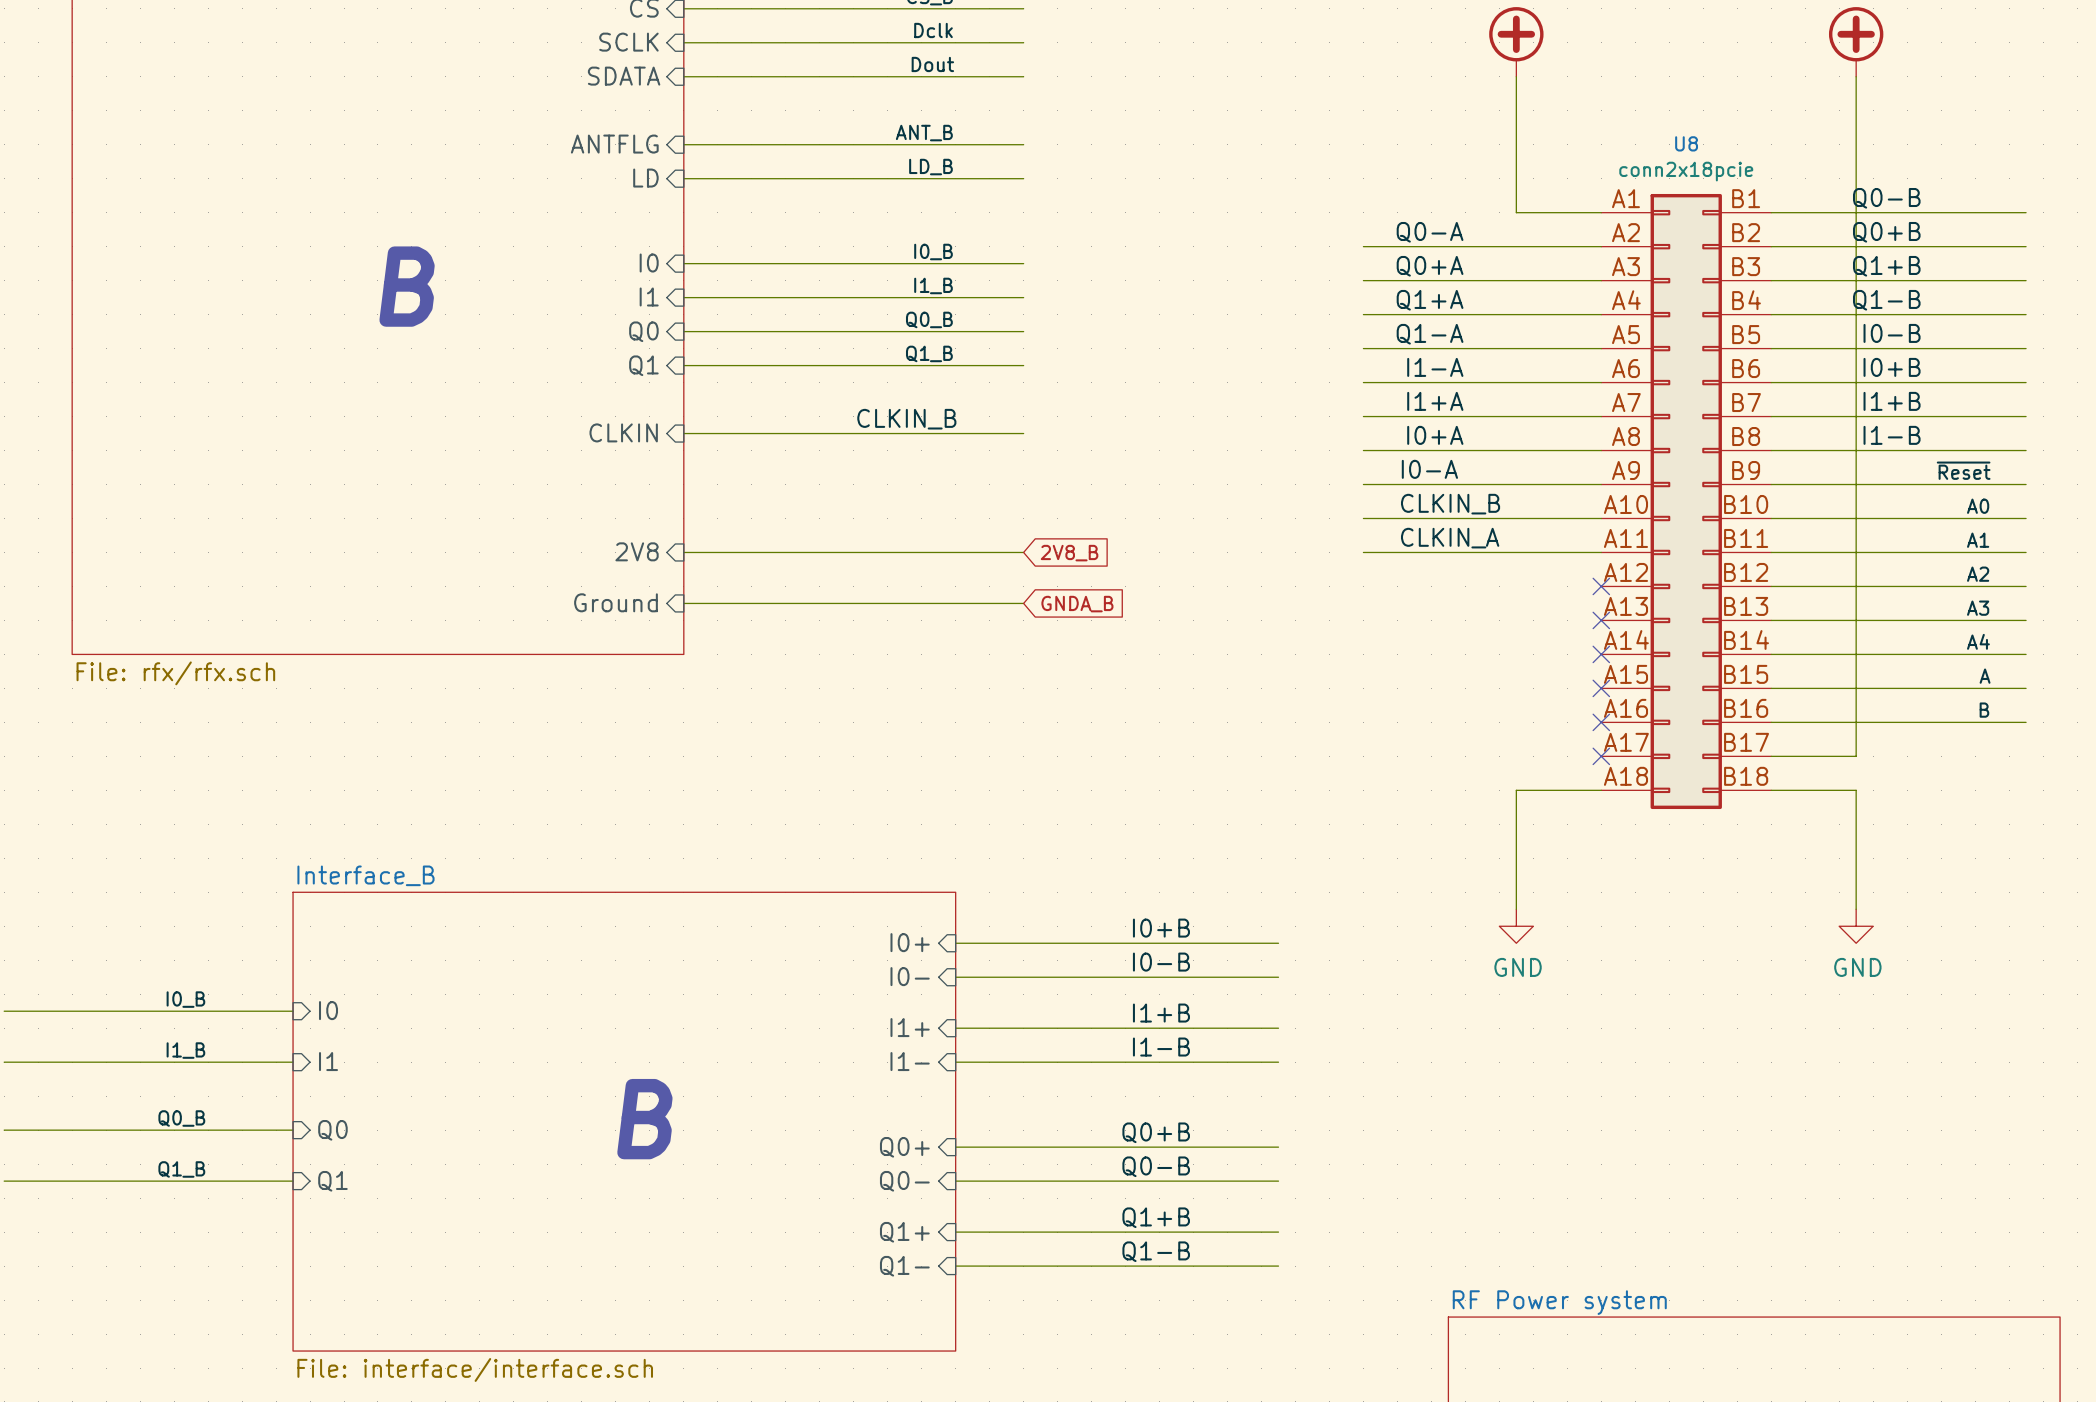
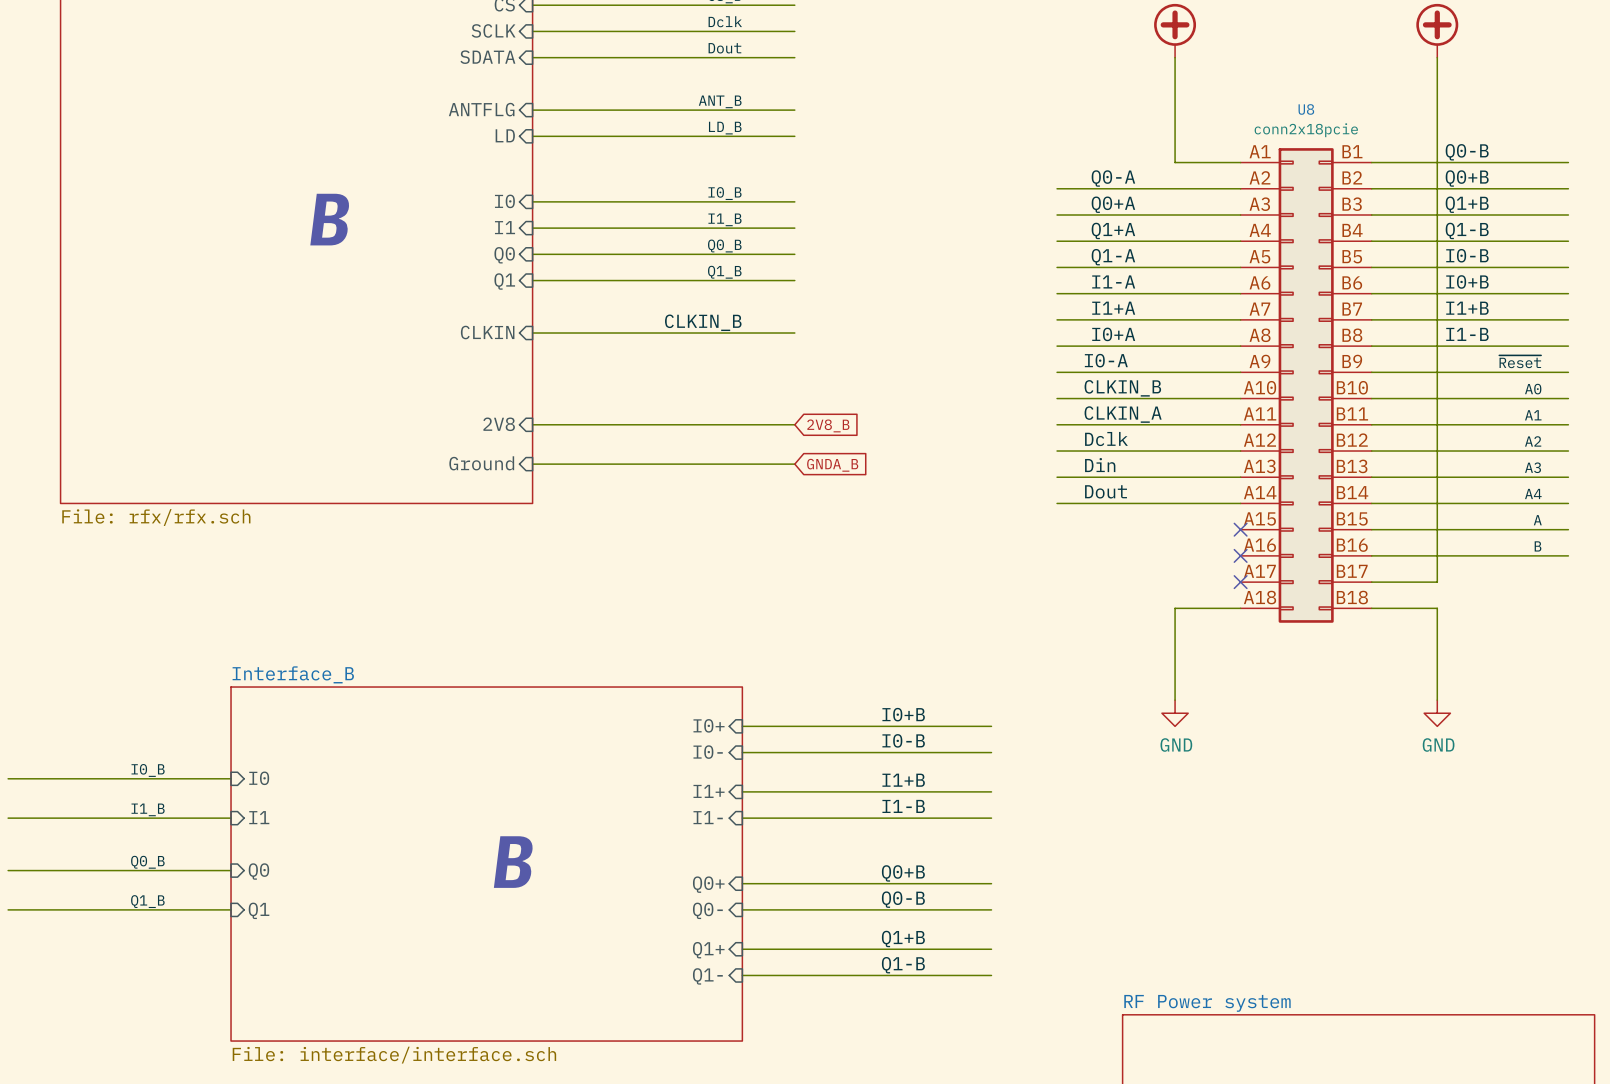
label: none -> Dclk (1106, 439)
wire: none -> (1057, 451) (1240, 451)
no-connect mark: (1601, 586) -> none
label: none -> Din (1100, 465)
wire: none -> (1057, 477) (1240, 477)
no-connect mark: (1601, 620) -> none
label: none -> Dout (1106, 491)
wire: none -> (1057, 503) (1240, 503)
no-connect mark: (1601, 654) -> none

